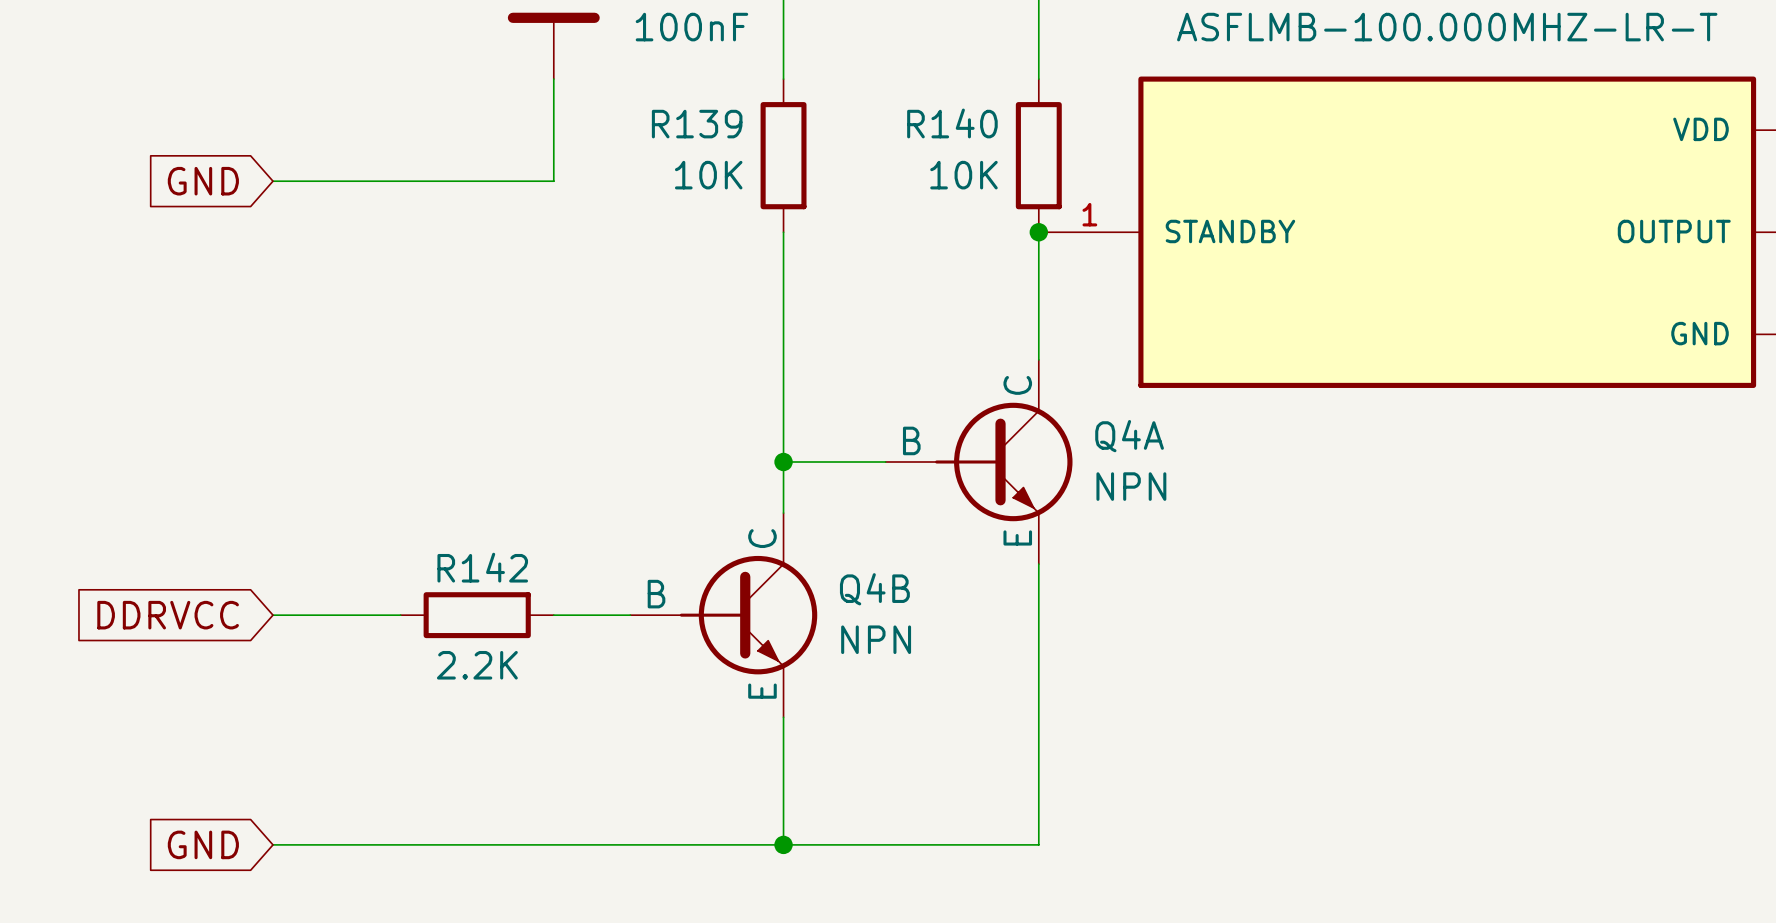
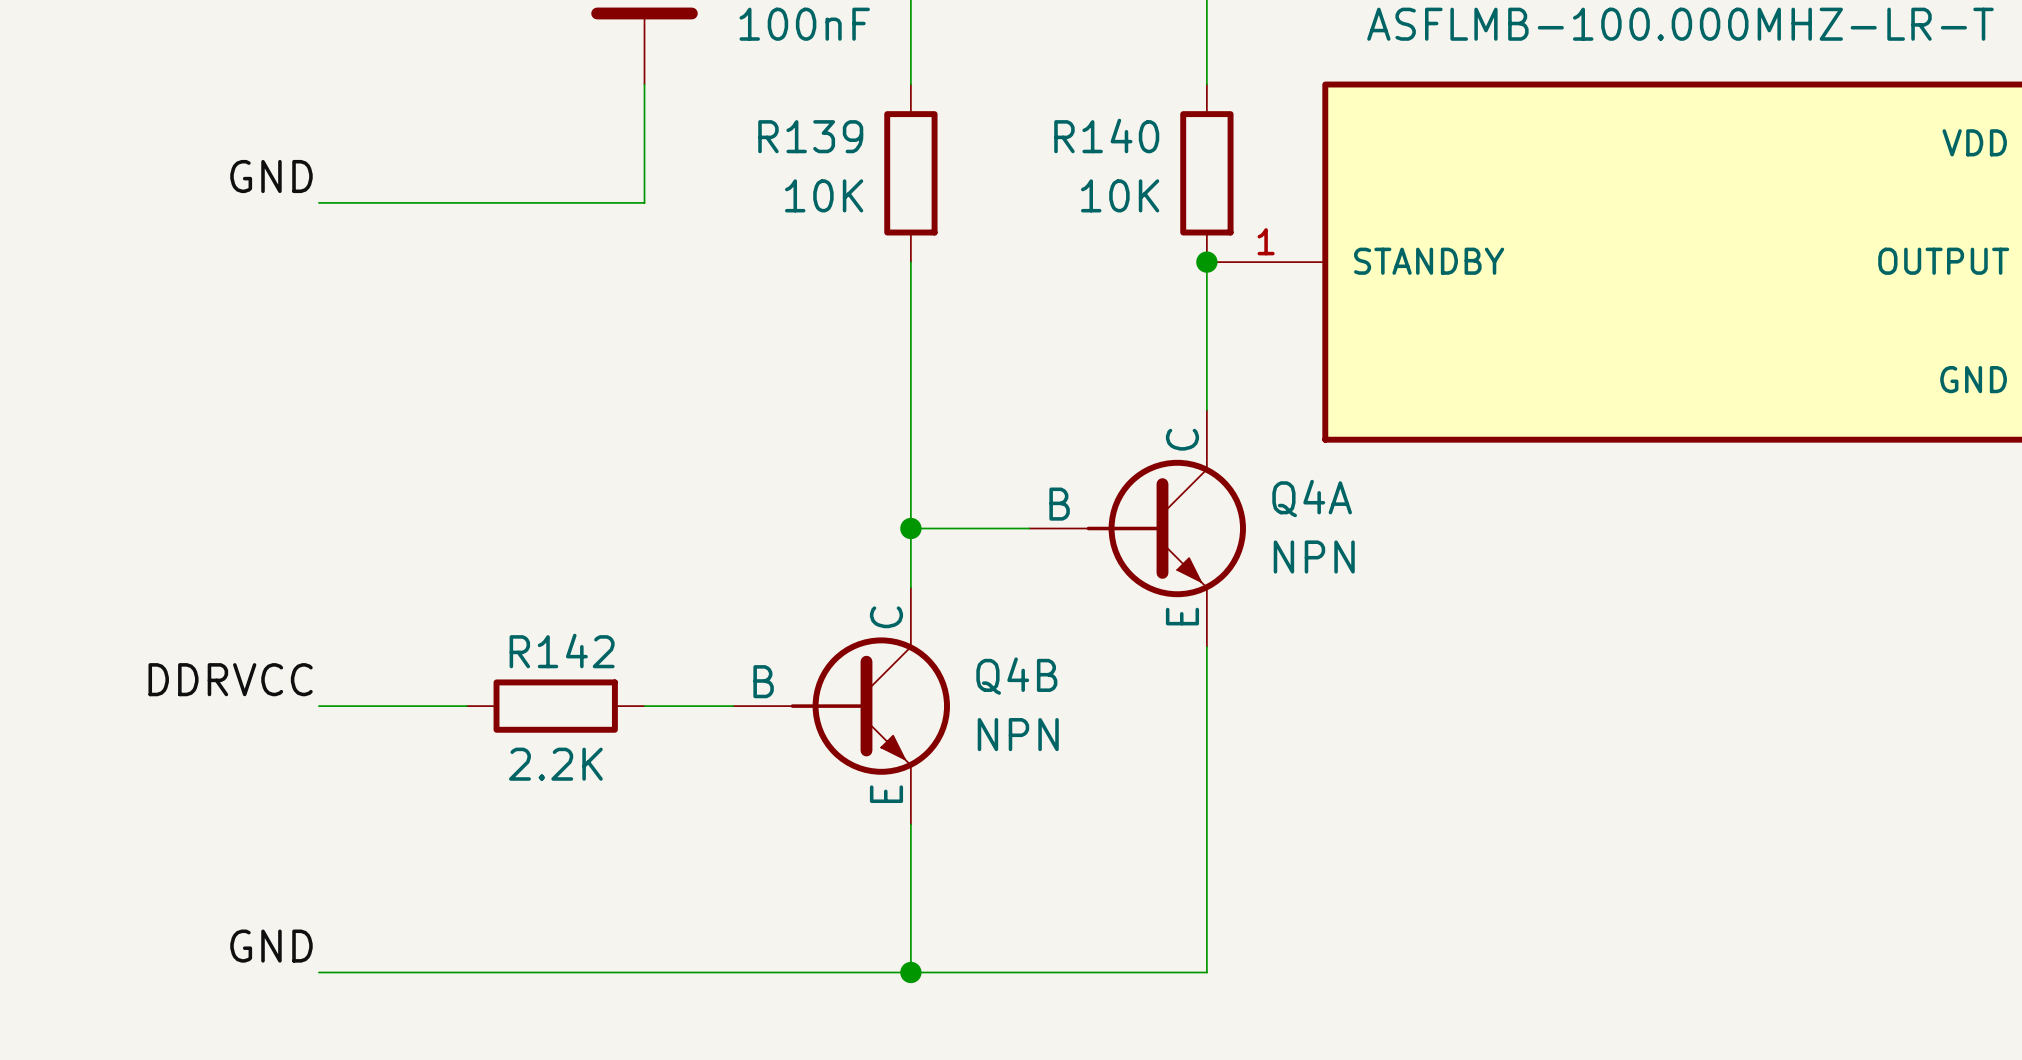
label: none -> GND (271, 176)
global label: GND (203, 181) -> none
label: none -> DDRVCC (230, 679)
global label: DDRVCC (168, 615) -> none
label: none -> GND (271, 946)
global label: GND (203, 844) -> none

